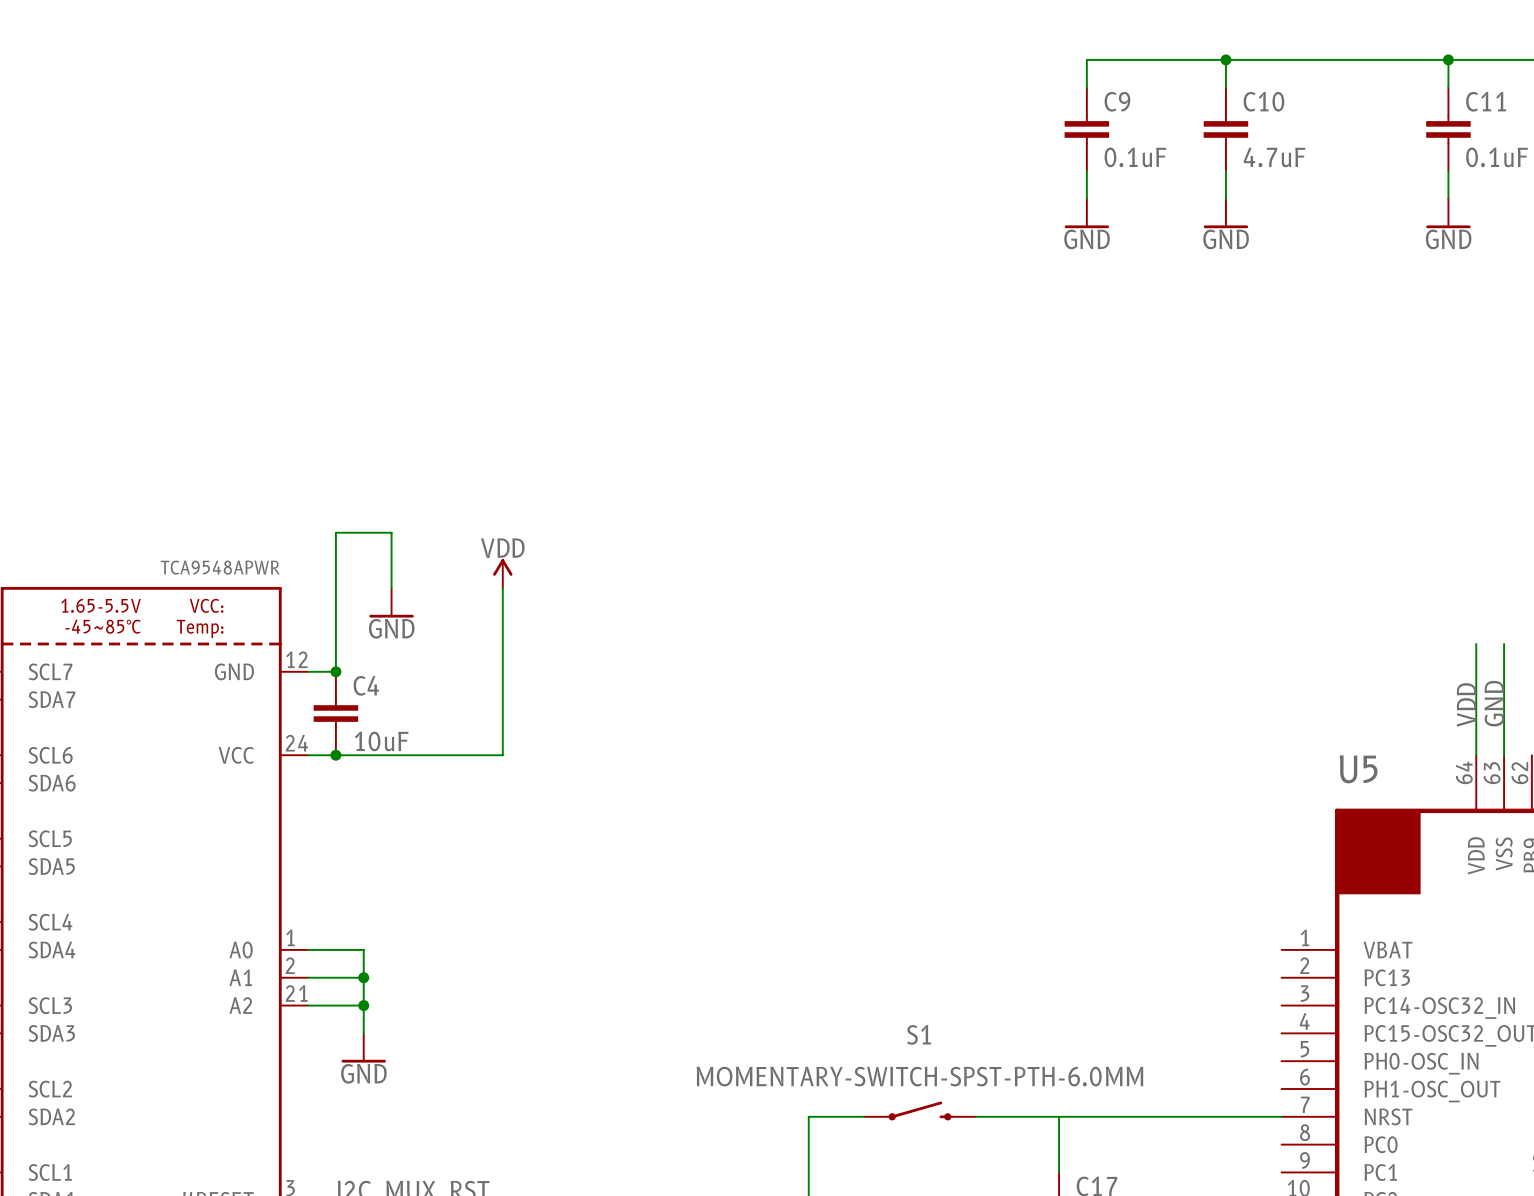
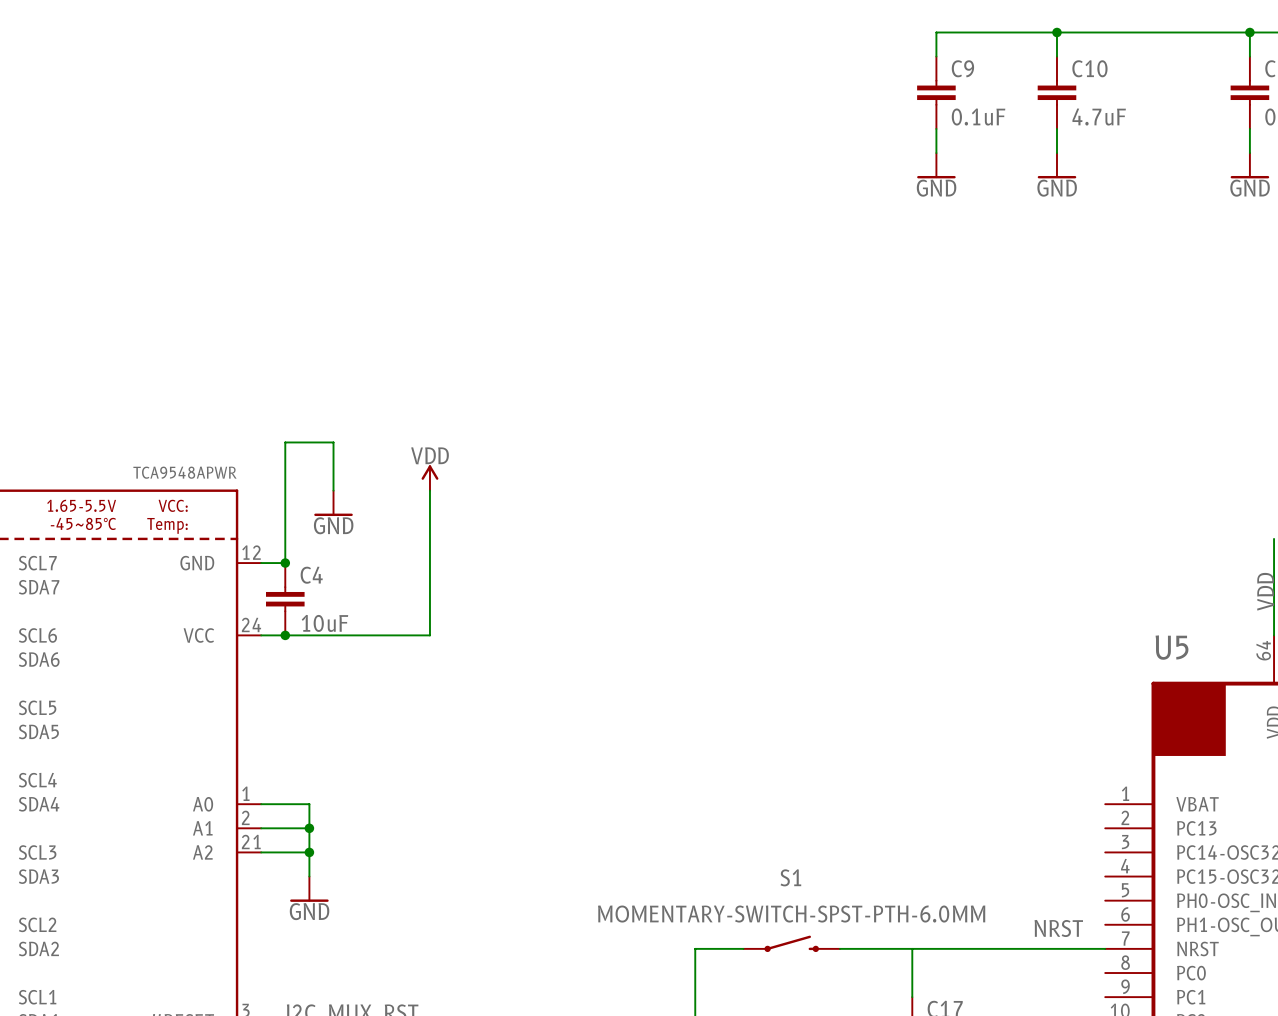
label: none -> NRST (1058, 928)

